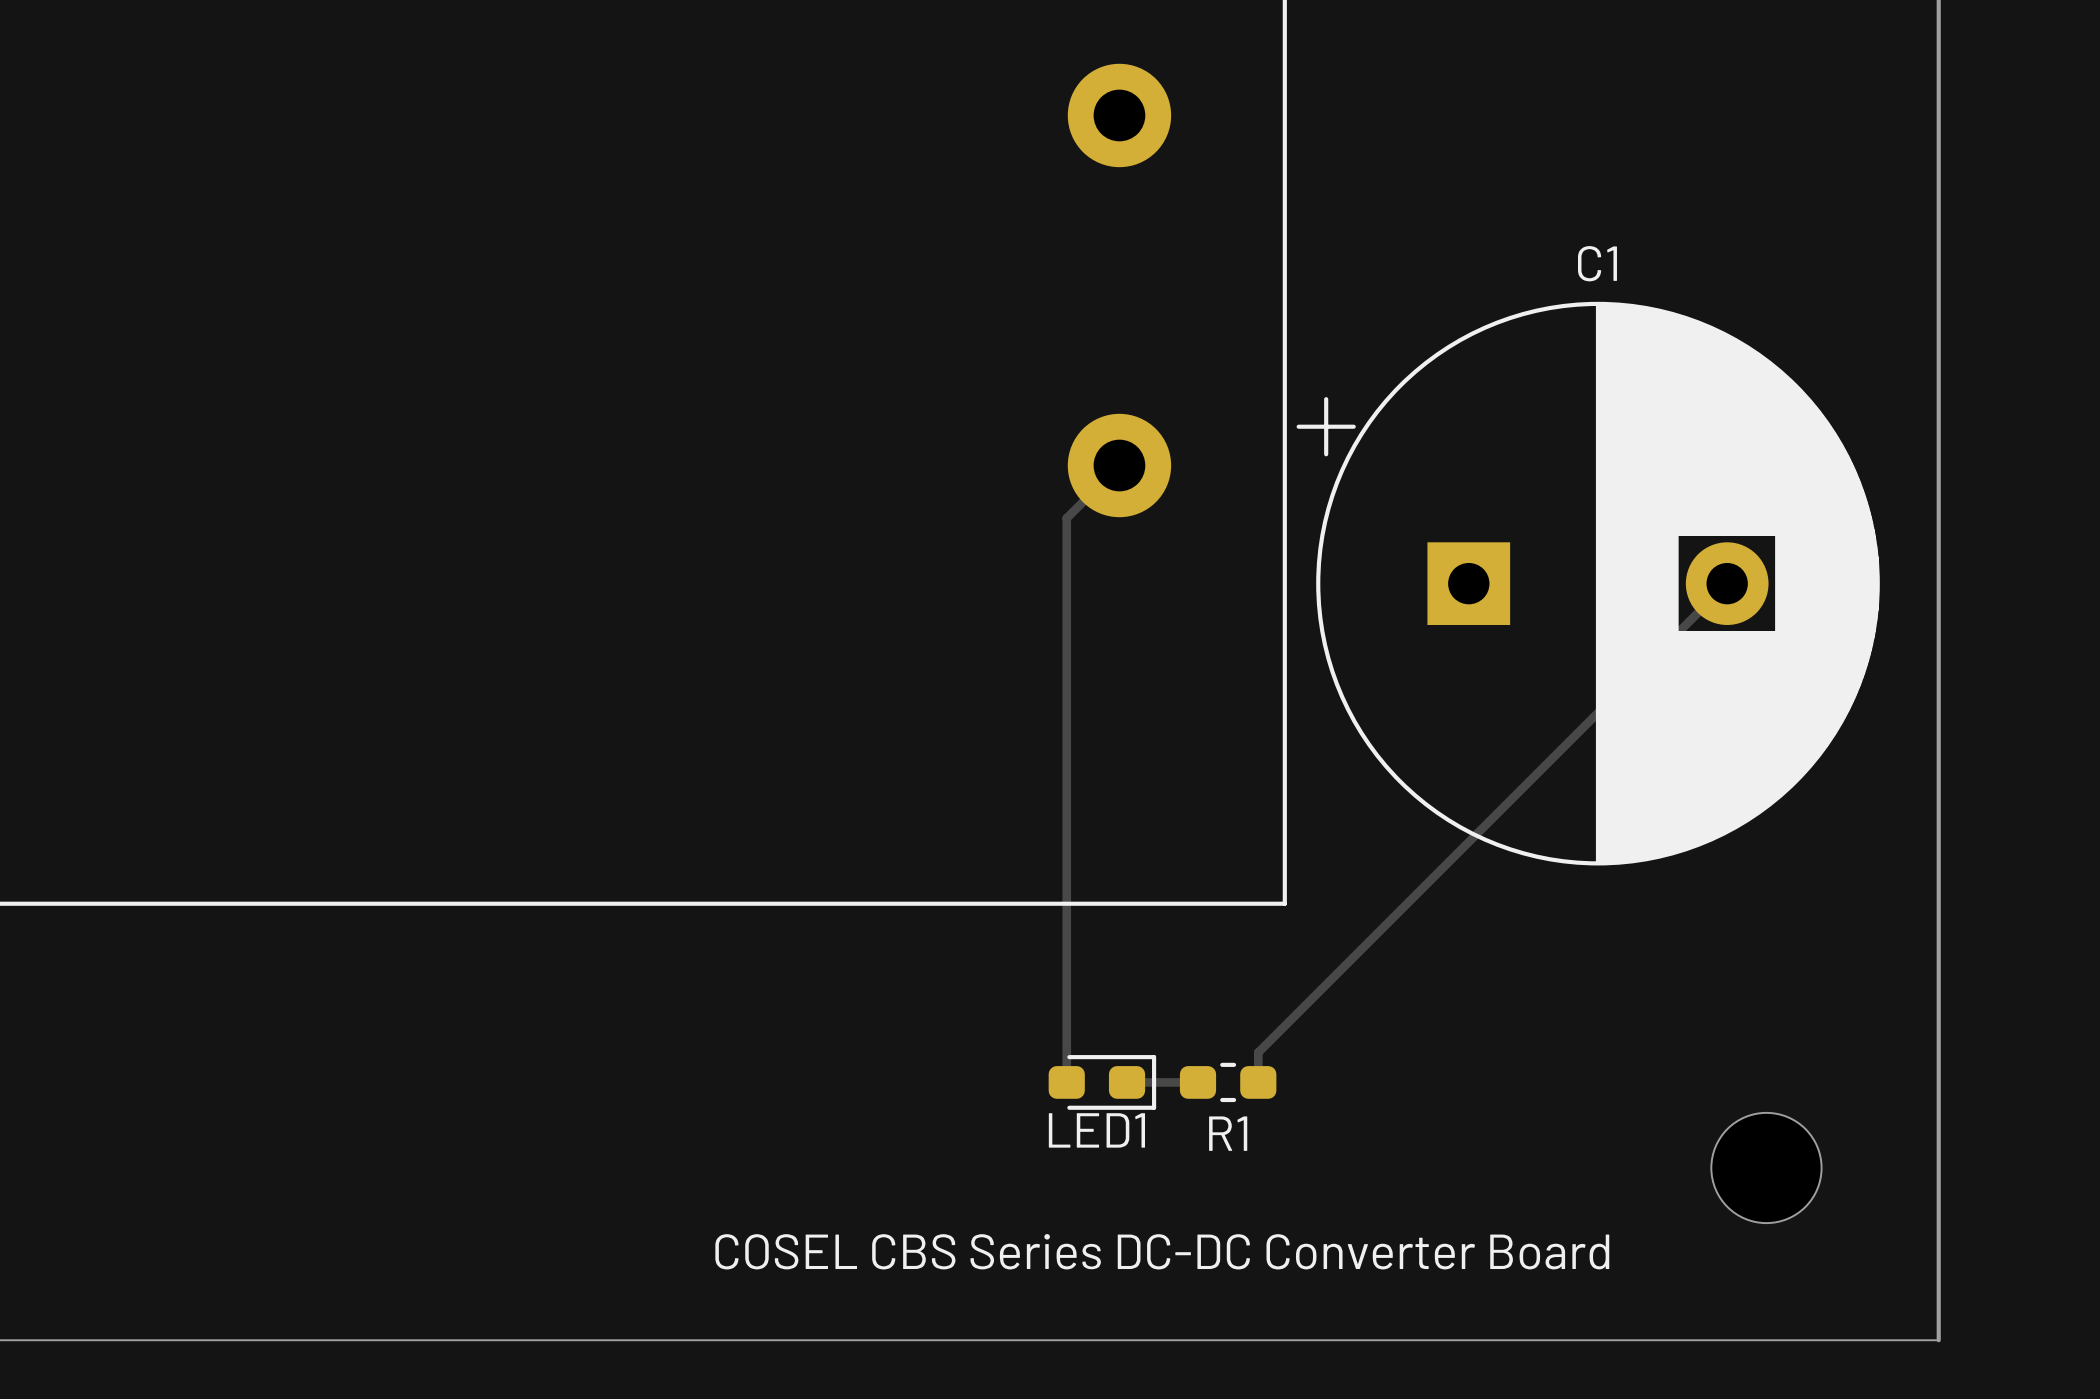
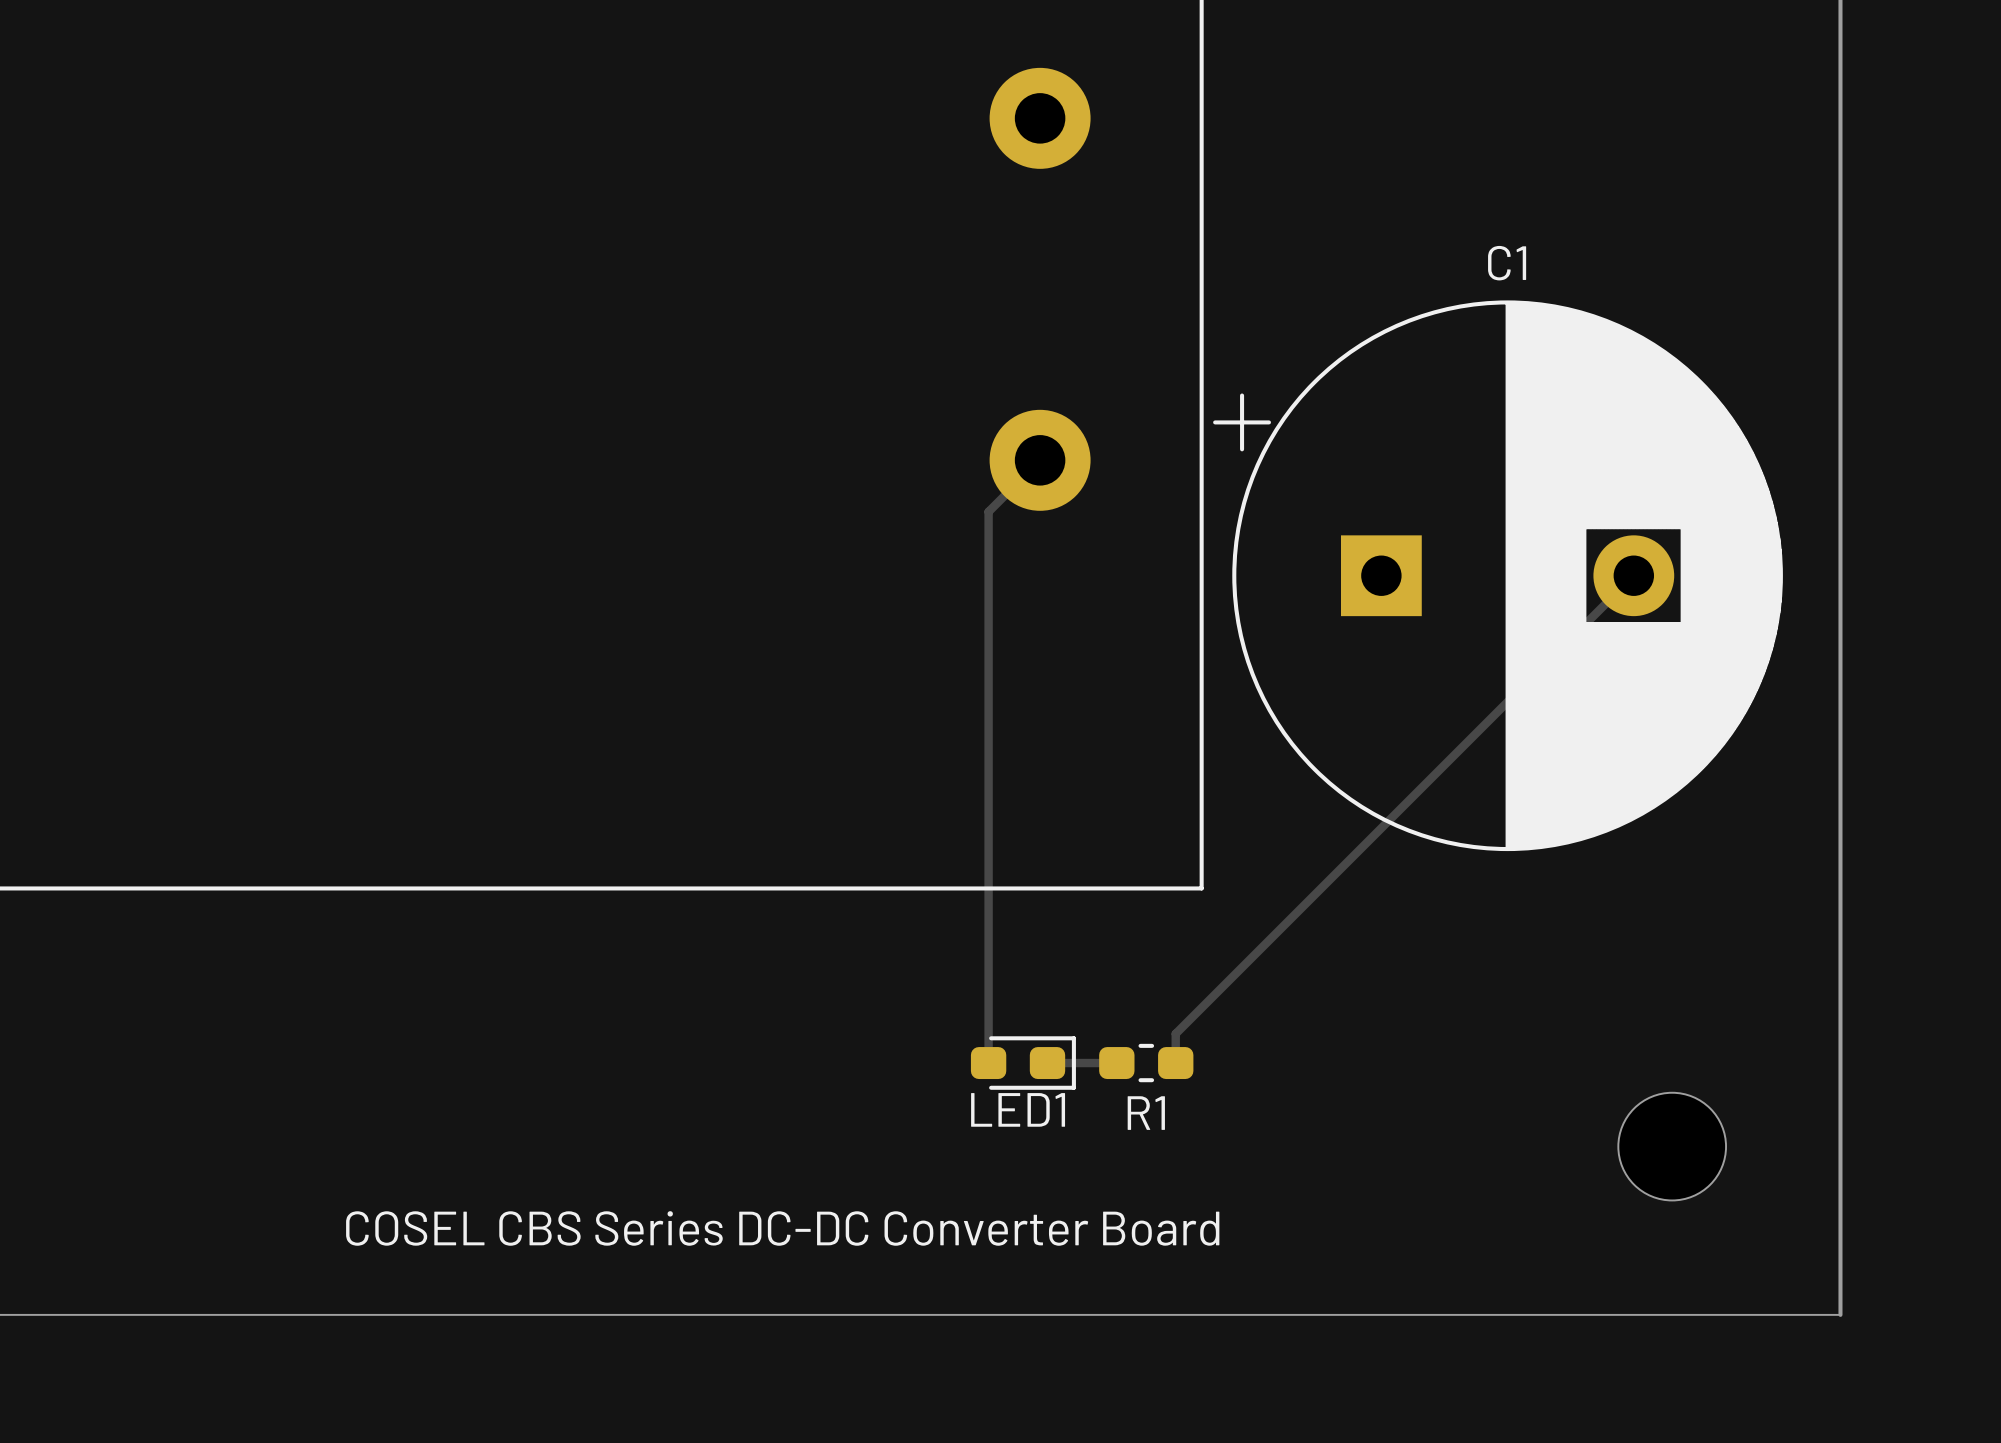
text position: COSEL CBS Series DC-DC Converter Board (1162, 1251) -> COSEL CBS Series DC-DC Converter Board (782, 1228)

